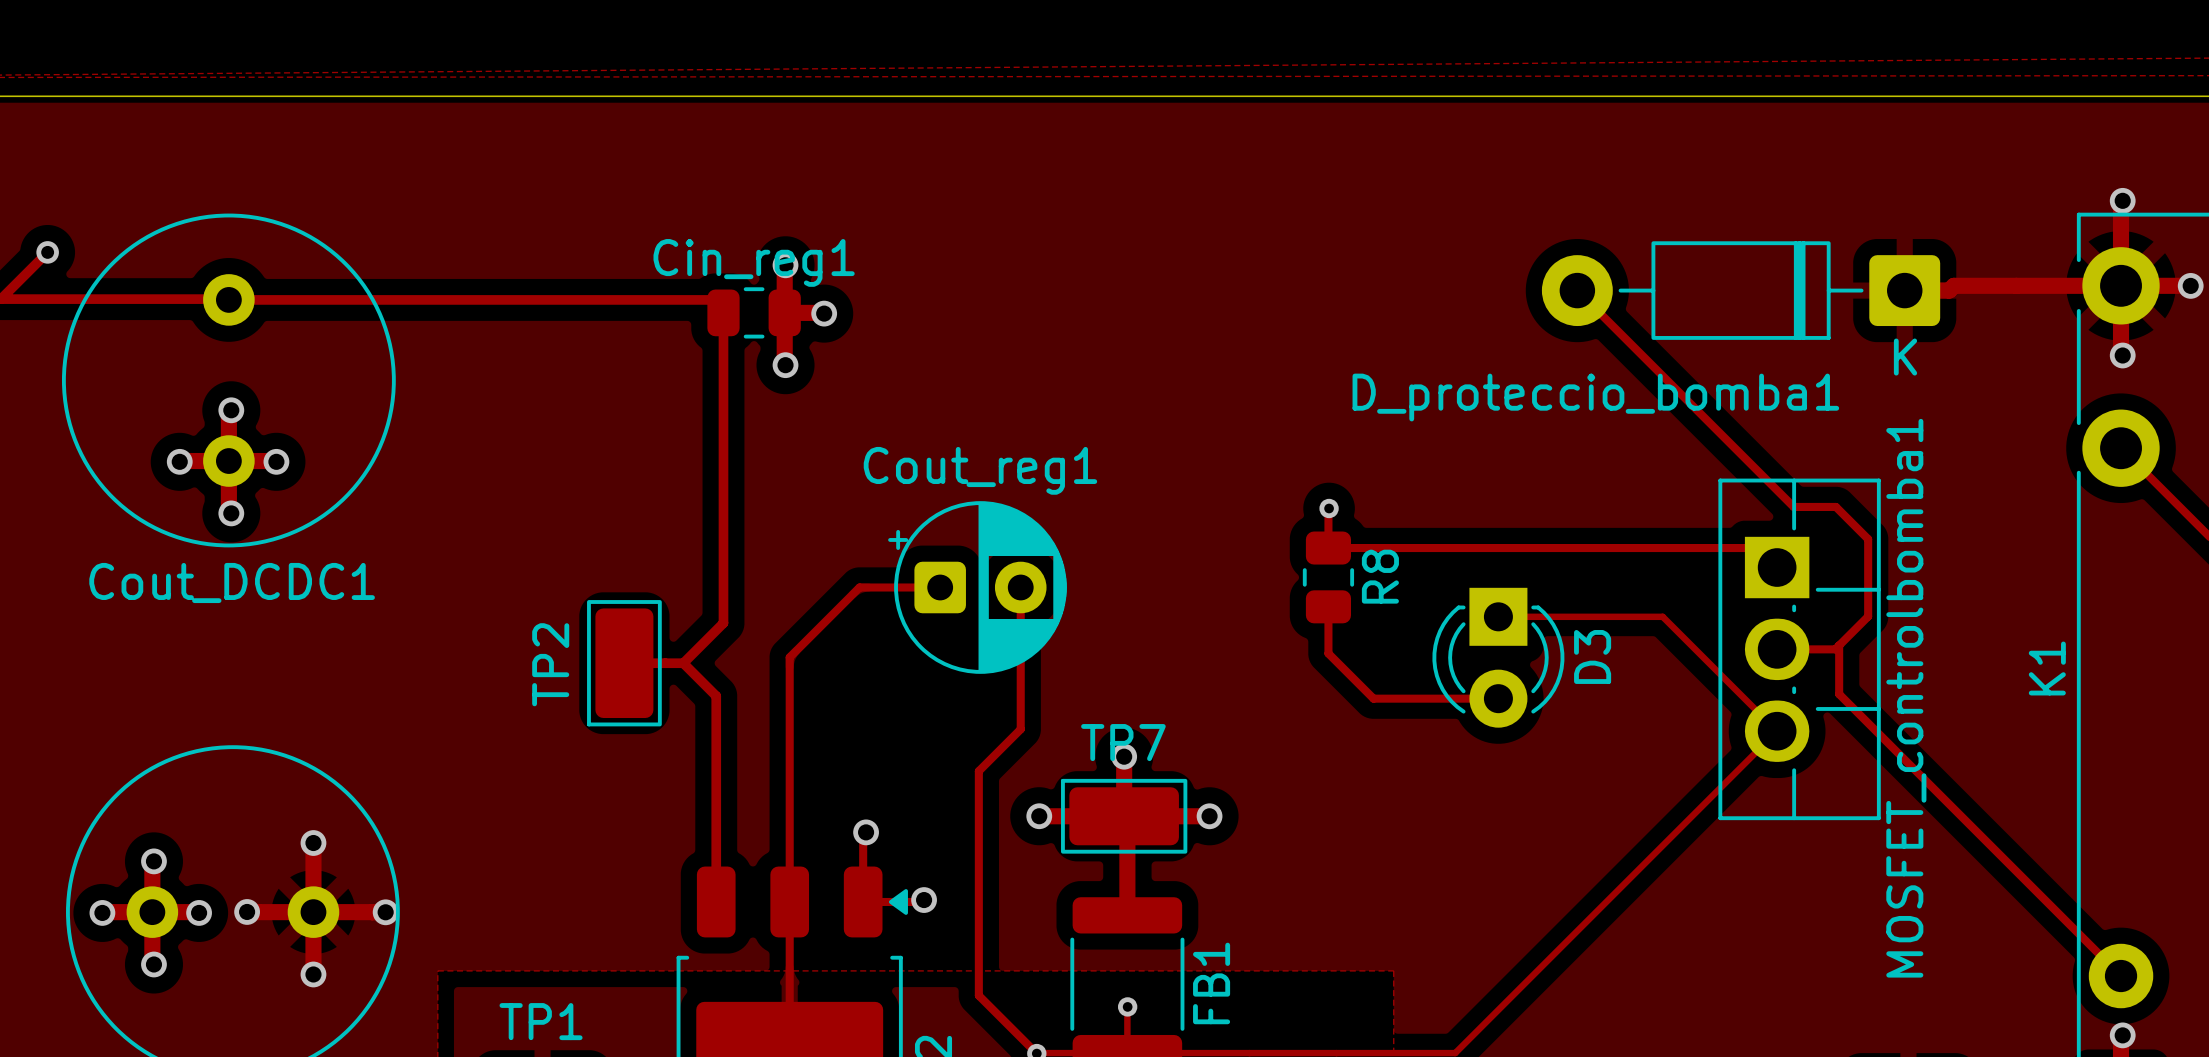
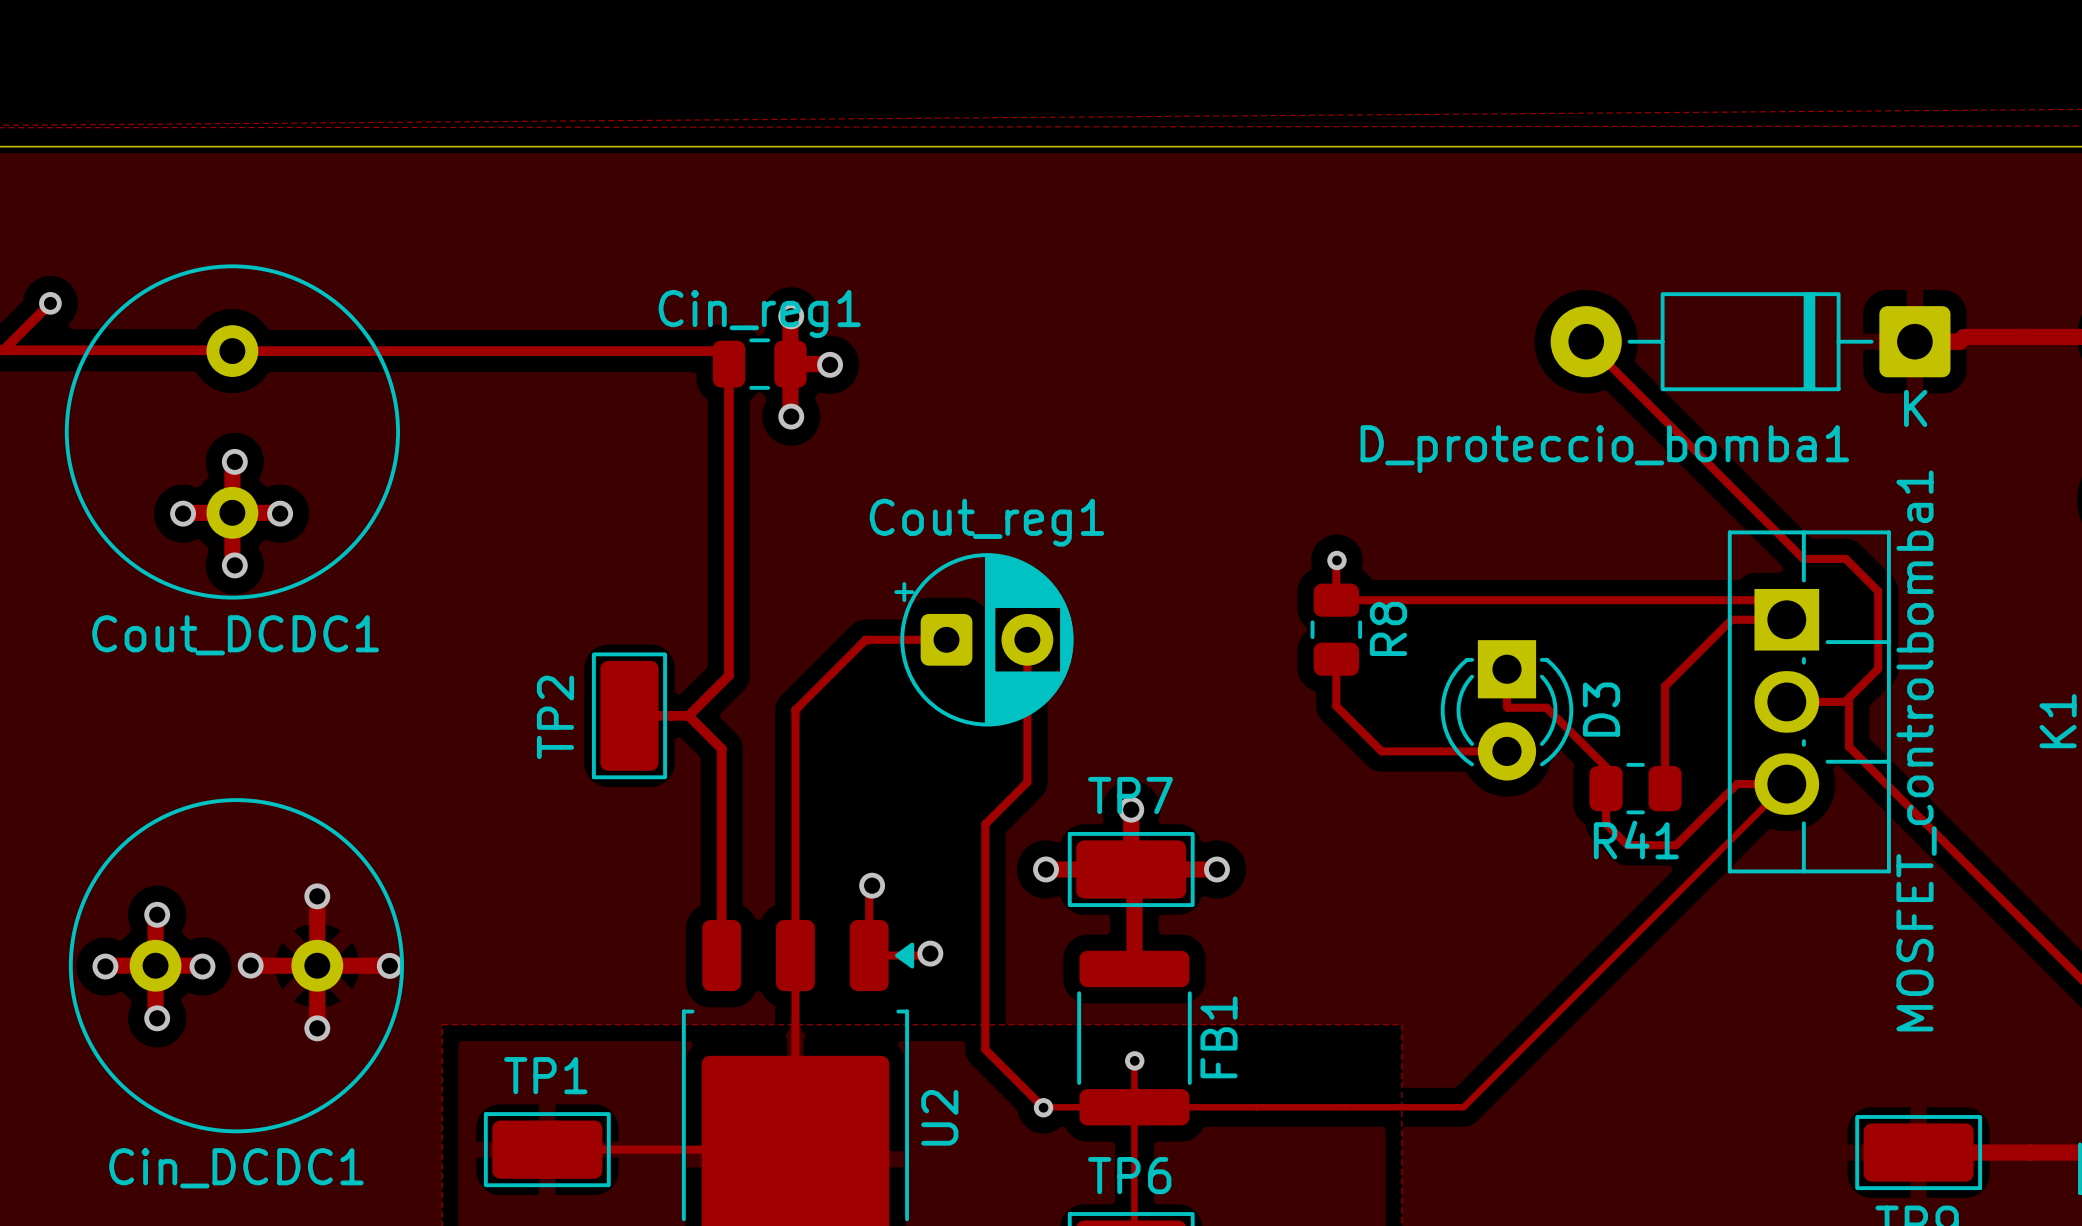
track: none -> (1777, 619) (1731, 619) (1665, 686) (1665, 788)
track: (1498, 616) (1662, 616) (1777, 731) -> (1506, 670) (1507, 707) (1546, 707) (1606, 767) (1606, 823) (1627, 845) (1676, 845) (1737, 784) (1786, 784)
R41: none -> (1635, 788)

